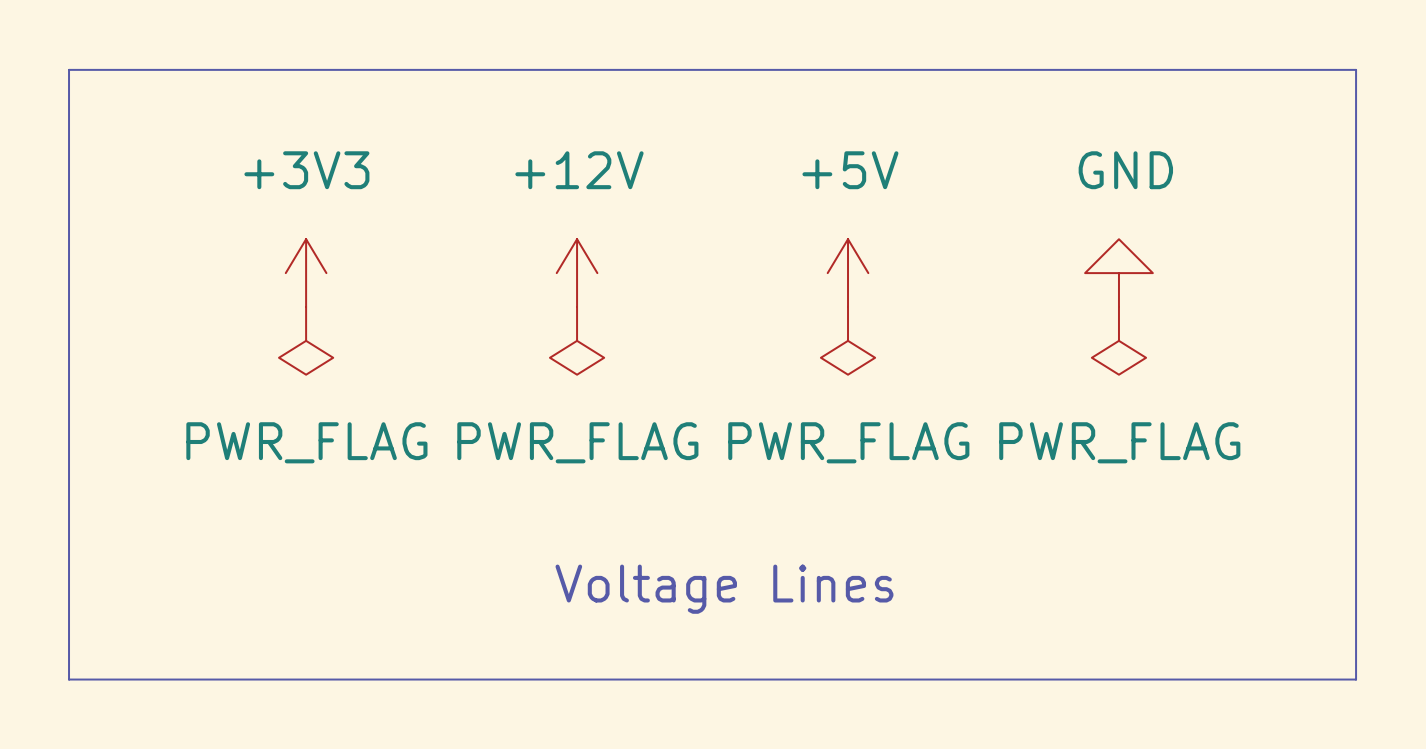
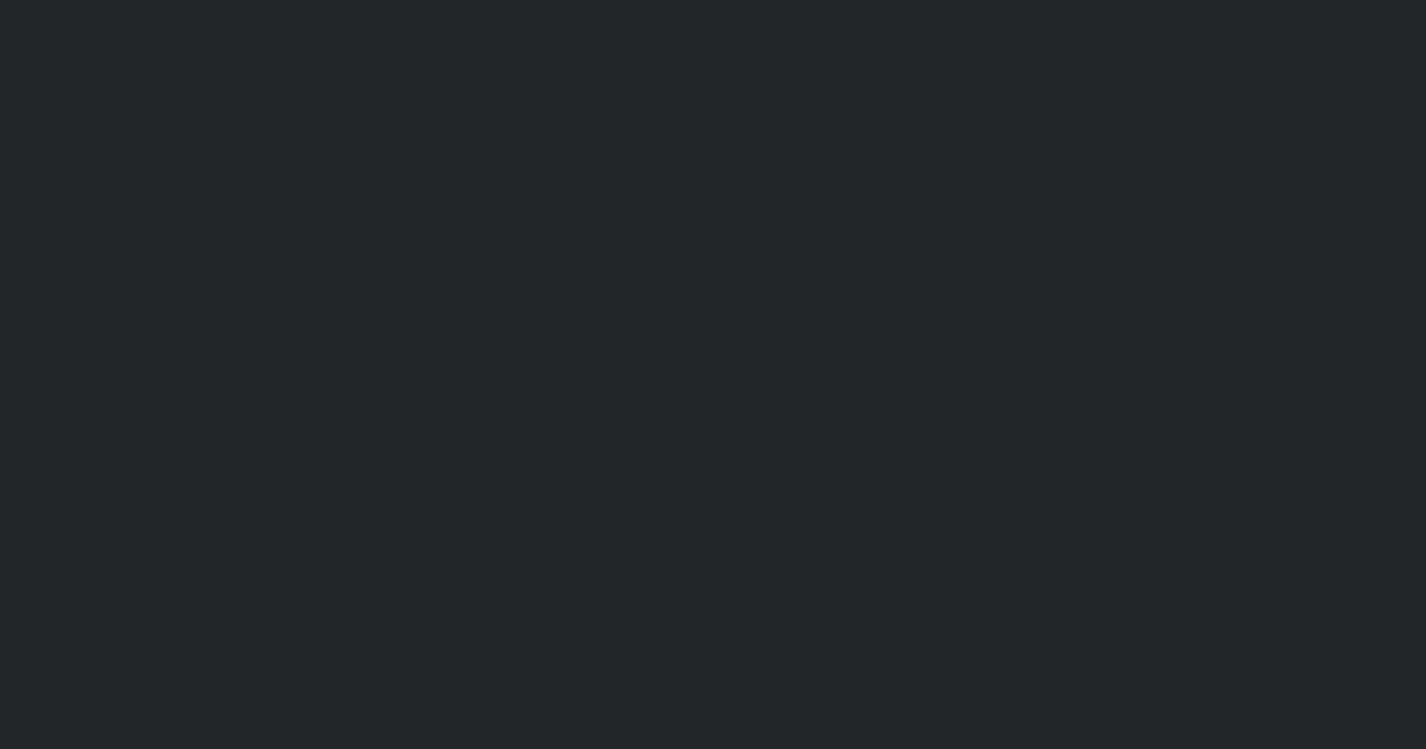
line: (69, 69) (1356, 69) (1356, 679) (69, 679) (69, 69) -> none
power symbol: +3V3 (306, 273) -> none
power symbol: +12V (577, 273) -> none
power symbol: +5V (848, 273) -> none
power symbol: GND (1118, 273) -> none
power symbol: PWR_FLAG (306, 340) -> none
power symbol: PWR_FLAG (577, 340) -> none
power symbol: PWR_FLAG (848, 340) -> none
power symbol: PWR_FLAG (1118, 340) -> none
text: Voltage Lines (724, 589) -> none

